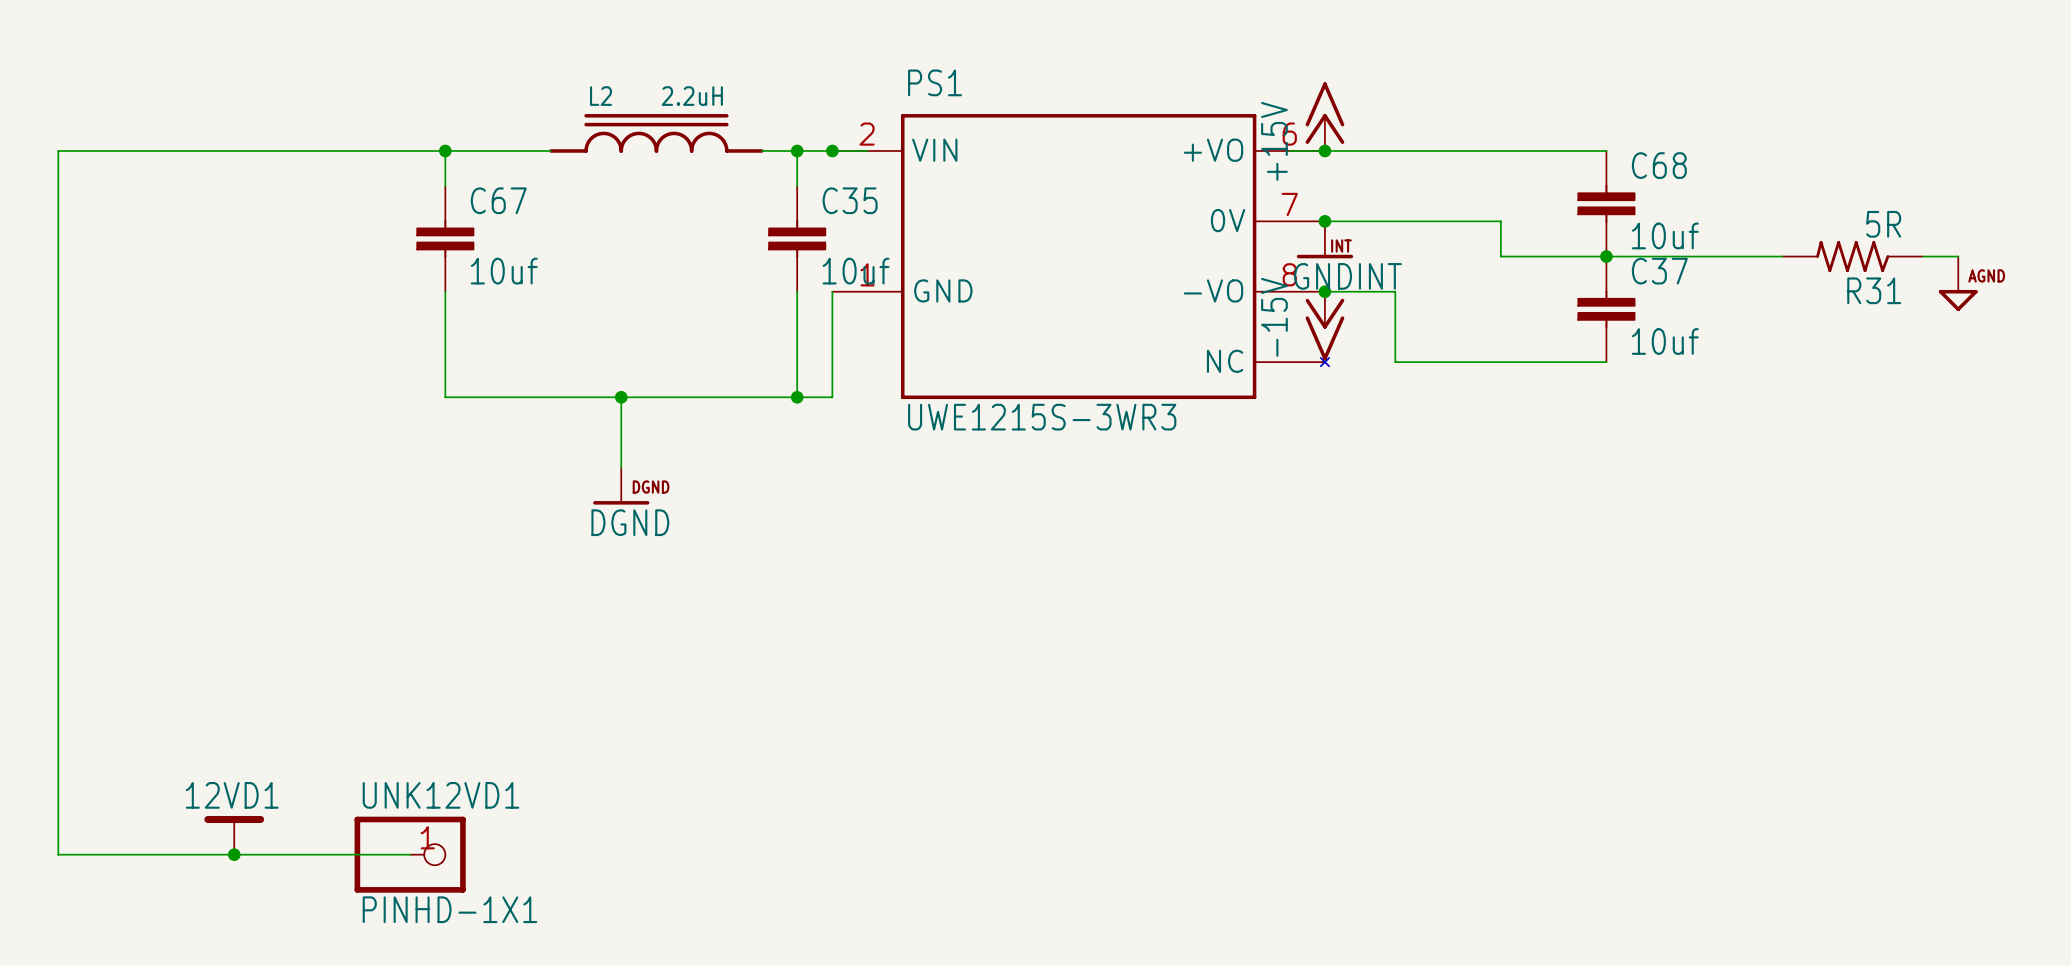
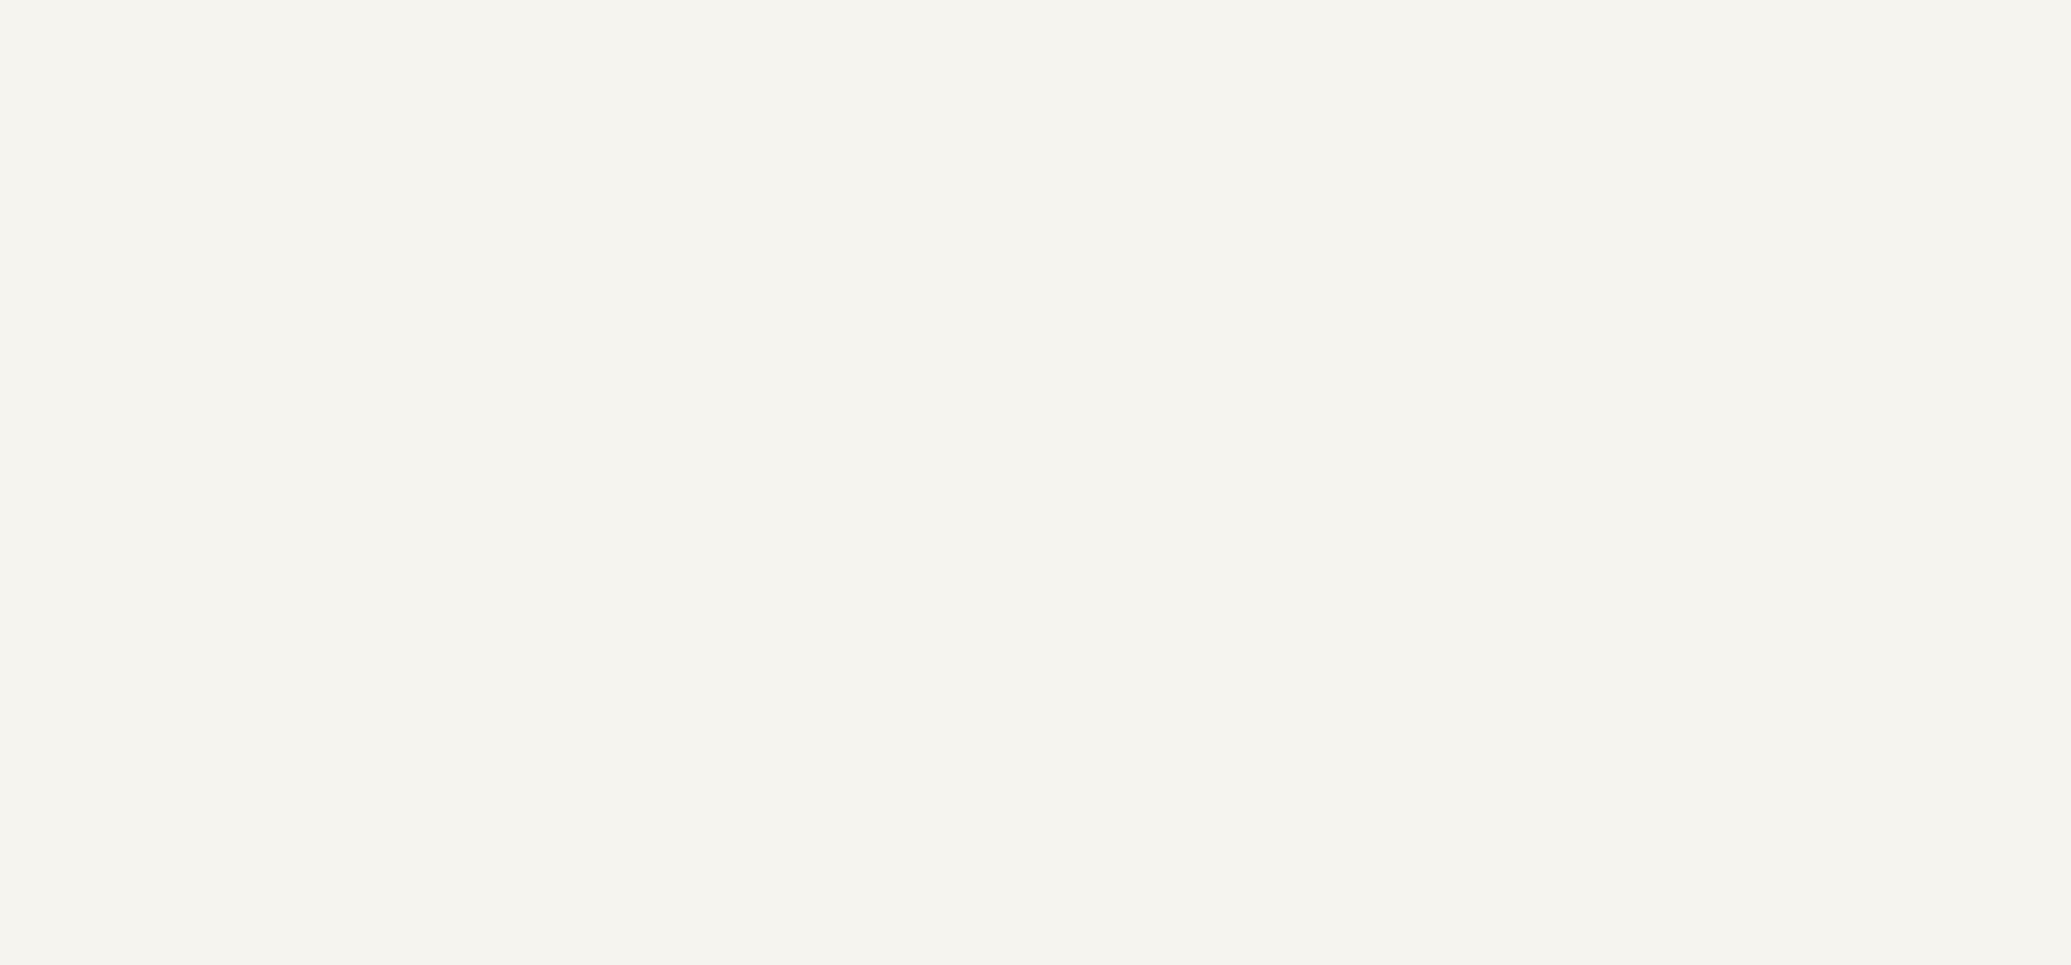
power symbol: +15V (1324, 116) -> none
L2: 2.2uH (656, 133) -> none
wire: (445, 150) (445, 186) -> none
junction: (445, 150) -> none
wire: (550, 150) (58, 150) (58, 854) (410, 854) -> none
wire: (762, 150) (867, 150) -> none
wire: (797, 150) (797, 186) -> none
junction: (797, 150) -> none
junction: (832, 150) -> none
wire: (1289, 150) (1606, 150) -> none
junction: (1324, 150) -> none
C68: 10uf (1606, 203) -> none
wire: (1324, 221) (1500, 221) (1500, 256) (1782, 256) -> none
junction: (1324, 221) -> none
C67: 10uf (445, 238) -> none
C35: 10uf (797, 238) -> none
power symbol: GNDINT (1324, 239) -> none
PS1: UWE1215S-3WR3 (1080, 256) -> none
junction: (1606, 256) -> none
R31: 5R (1852, 256) -> none
wire: (1923, 256) (1958, 256) -> none
power symbol: (1958, 283) -> none
wire: (445, 291) (445, 397) (832, 397) (832, 291) -> none
wire: (797, 291) (797, 397) -> none
wire: (1324, 291) (1395, 291) (1395, 362) (1606, 362) -> none
junction: (1324, 291) -> none
C37: 10uf (1606, 309) -> none
power symbol: -15V (1324, 326) -> none
wire: (621, 397) (621, 467) -> none
junction: (621, 397) -> none
junction: (797, 397) -> none
power symbol: DGND (621, 486) -> none
power symbol: 12VD1 (234, 835) -> none
junction: (234, 854) -> none
UNK12VD1: PINHD-1X1 (410, 854) -> none

